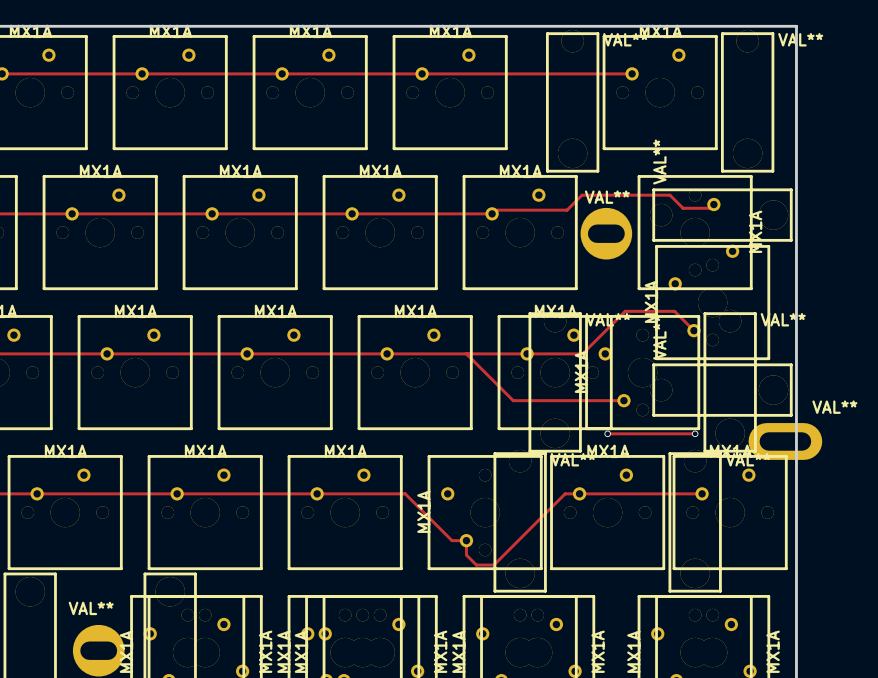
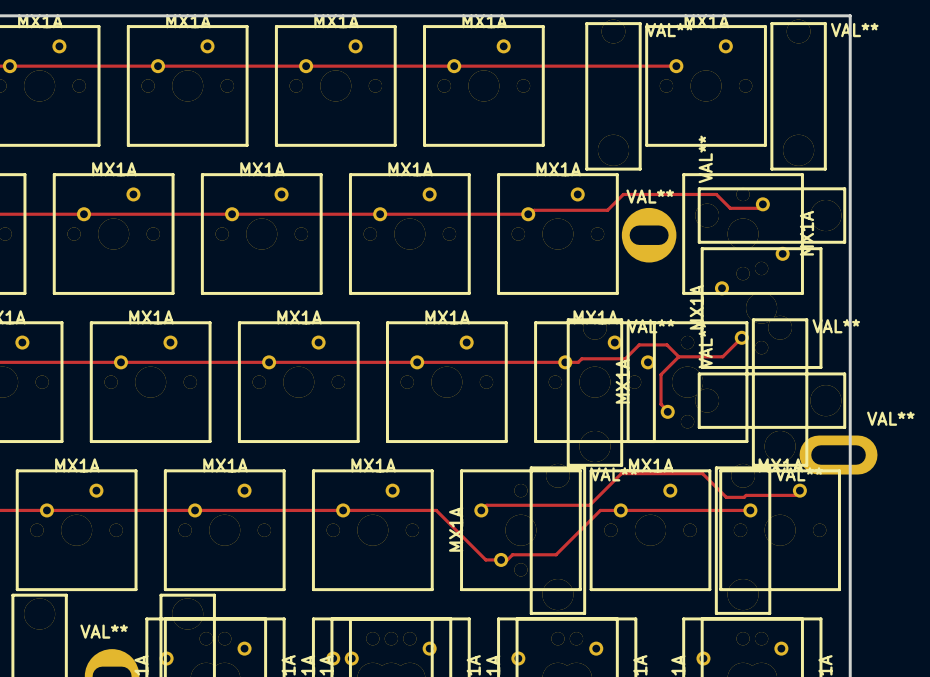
track: (693, 330) (674, 311) (625, 311) (582, 353) (539, 353) -> (678, 356) (666, 344) (639, 344) (625, 358) (581, 358) (578, 362)
track: none -> (741, 337) (722, 356) (678, 356)
track: (466, 353) (513, 400) (623, 400) -> (678, 356) (661, 374) (661, 404) (667, 411)
track: (607, 433) (695, 433) -> none
via: (607, 433) -> none
via: (695, 433) -> none
track: none -> (799, 490) (795, 495) (726, 497) (702, 473) (621, 473) (589, 505) (486, 505) (481, 510)
track: (565, 493) (493, 565) (476, 565) (466, 555) (466, 540) -> (605, 510) (600, 510) (556, 554) (512, 554) (507, 559) (501, 559)

